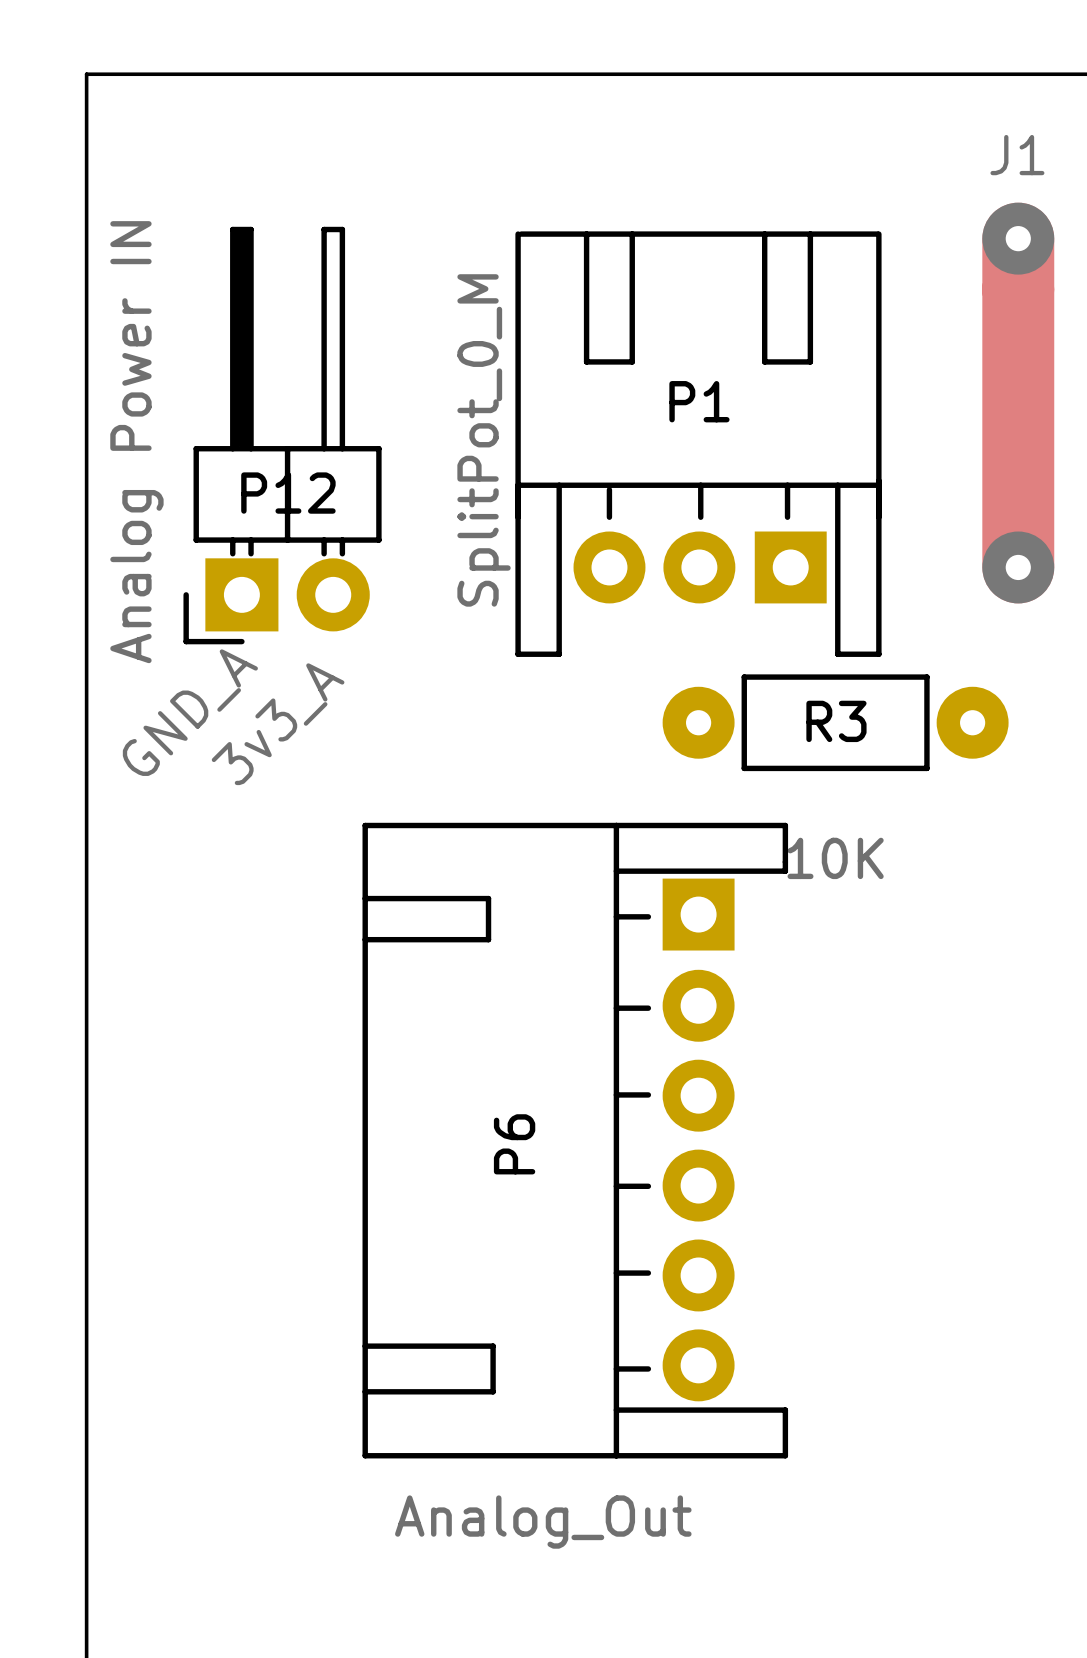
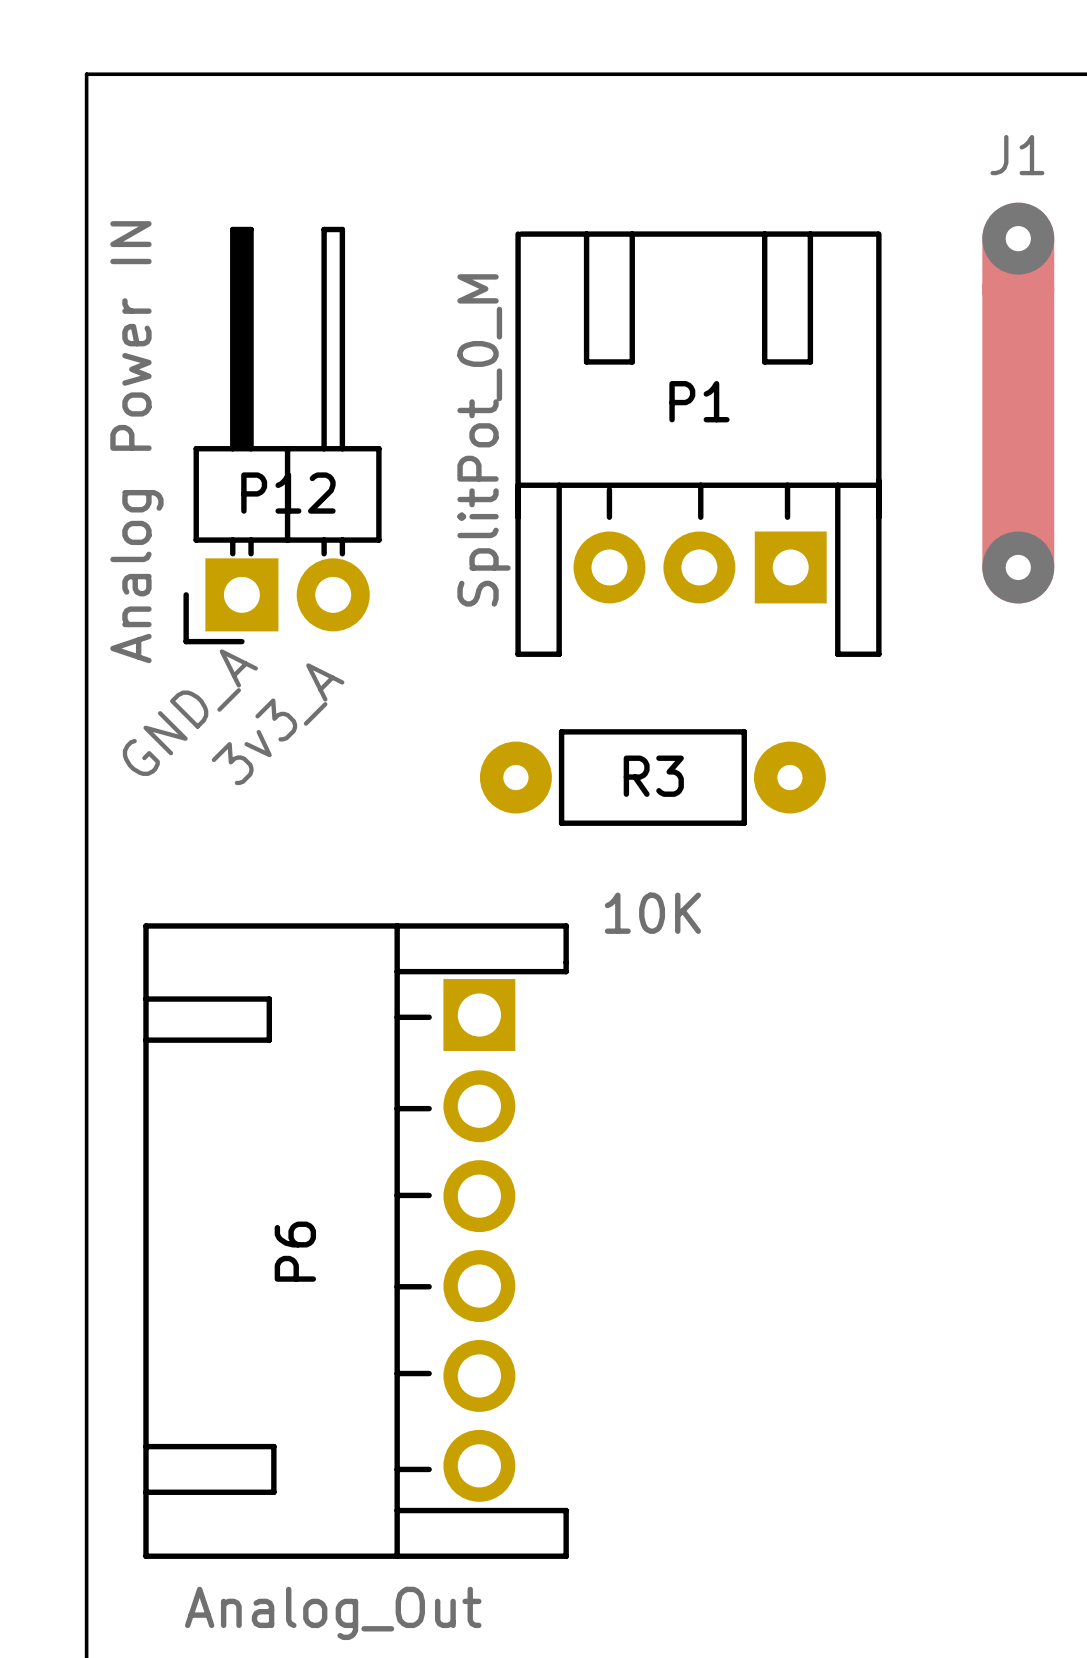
R3 position: (835, 722) -> (652, 777)
P6 footprint: [362, 822, 789, 1459] -> [143, 923, 569, 1559]

